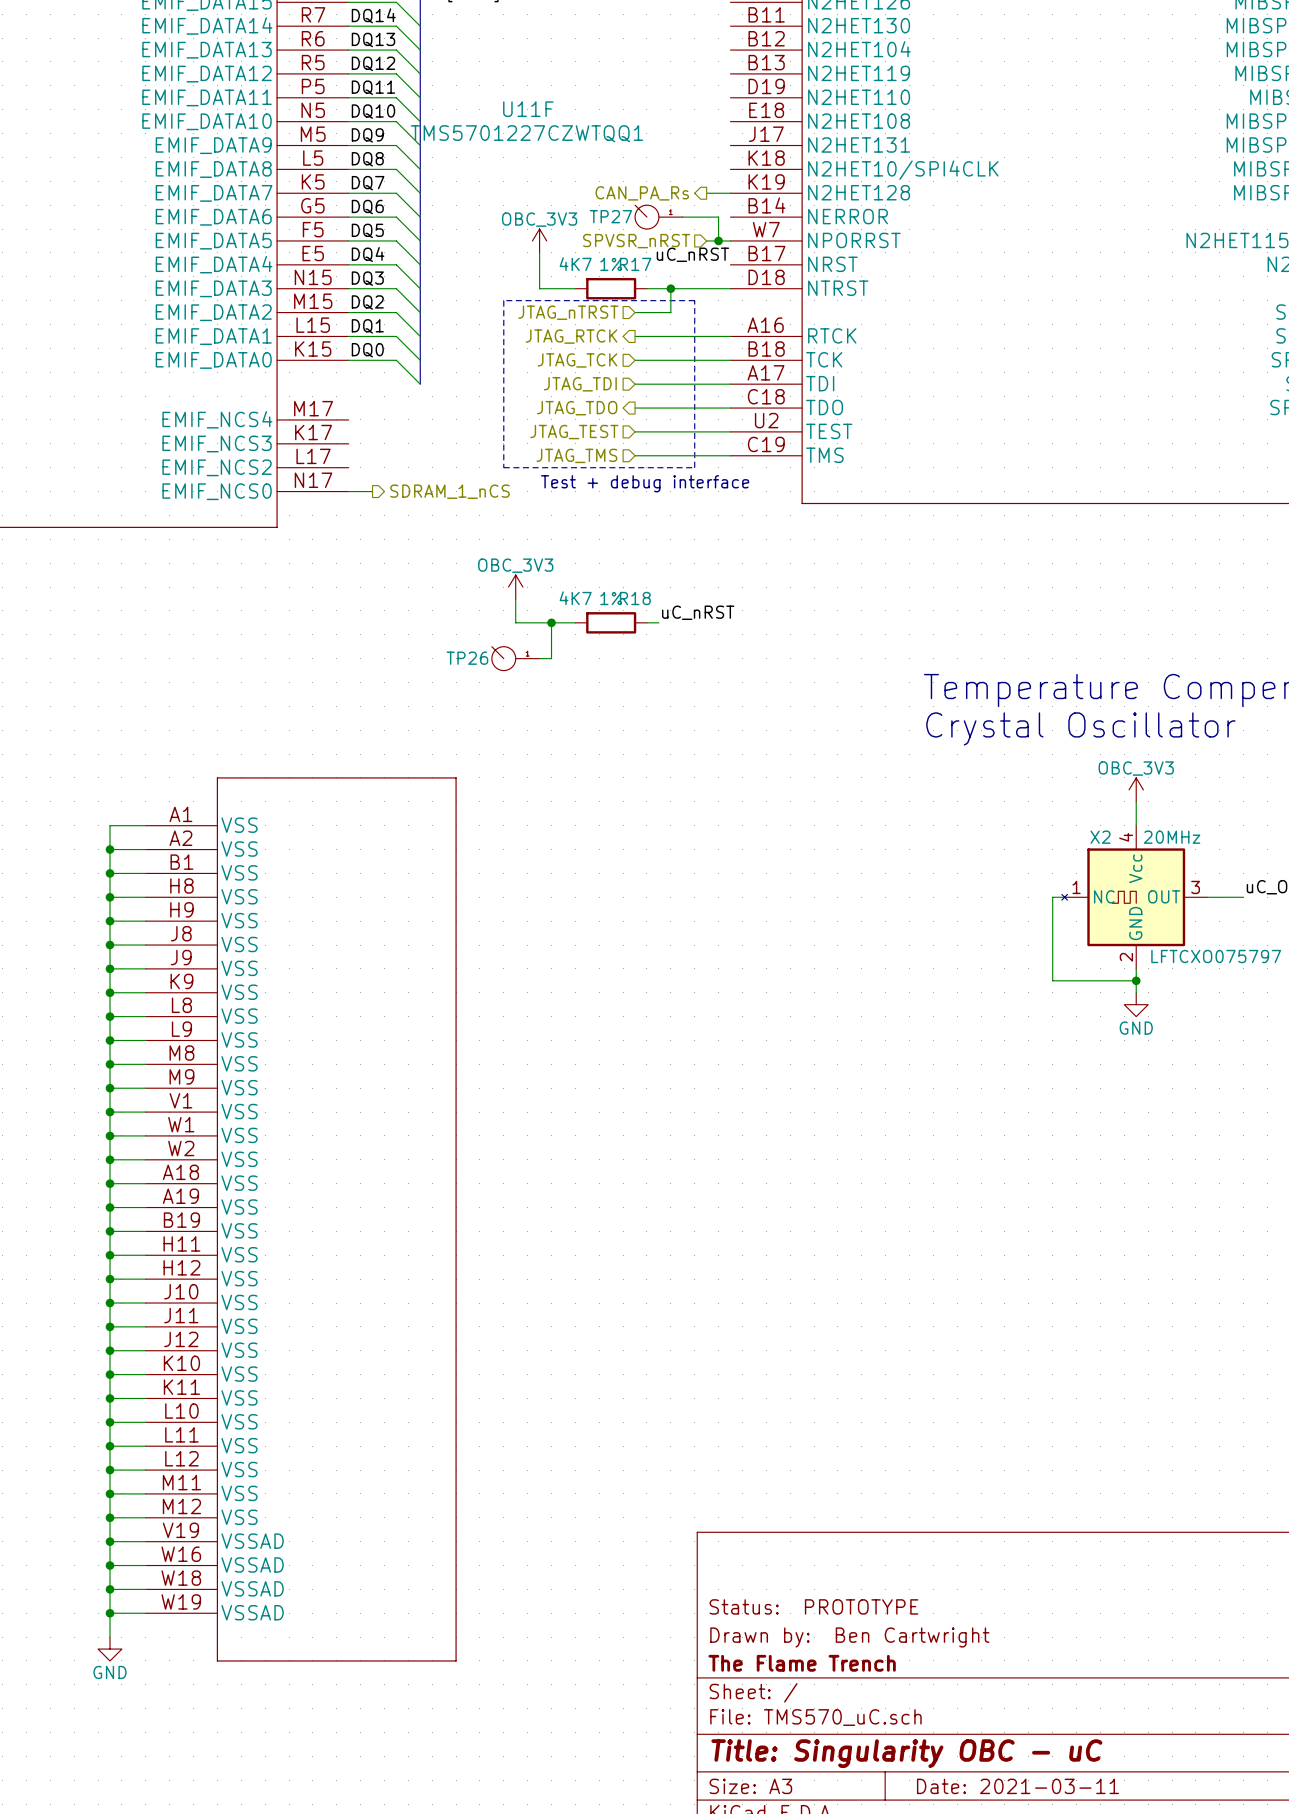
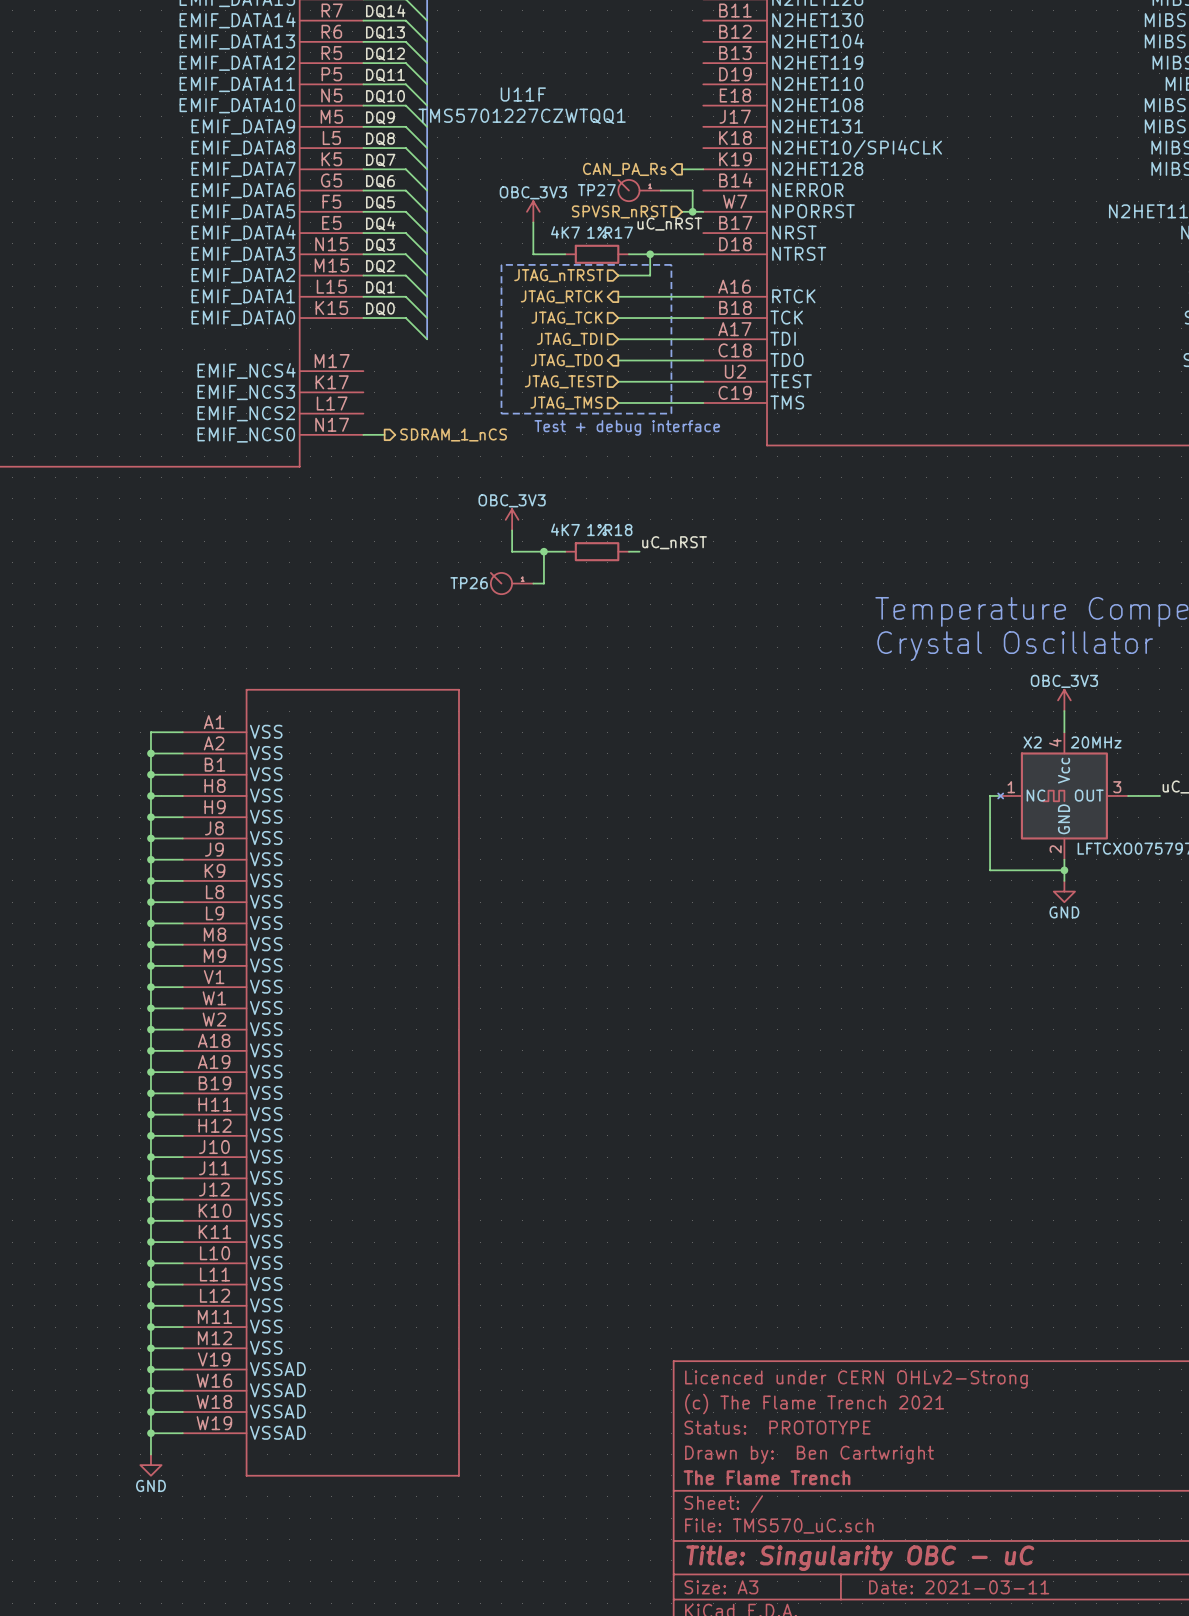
title block: none -> Licenced under CERN OHLv2-Strong (856, 1379)
title block: none -> (c) The Flame Trench 2021 (814, 1404)

